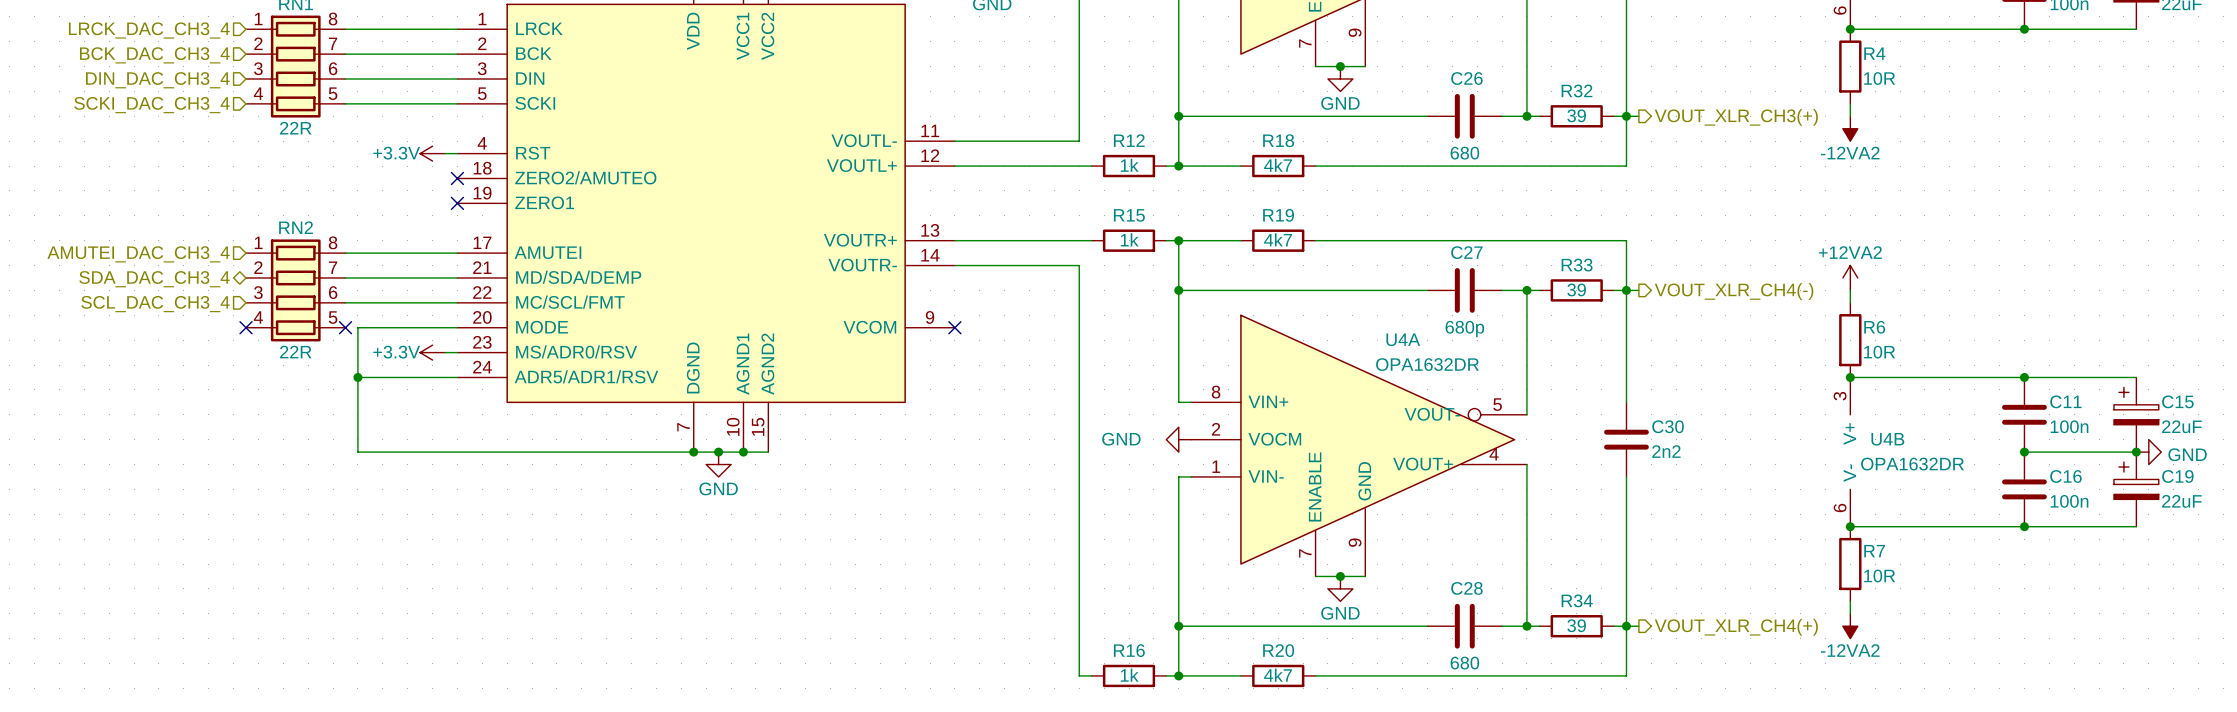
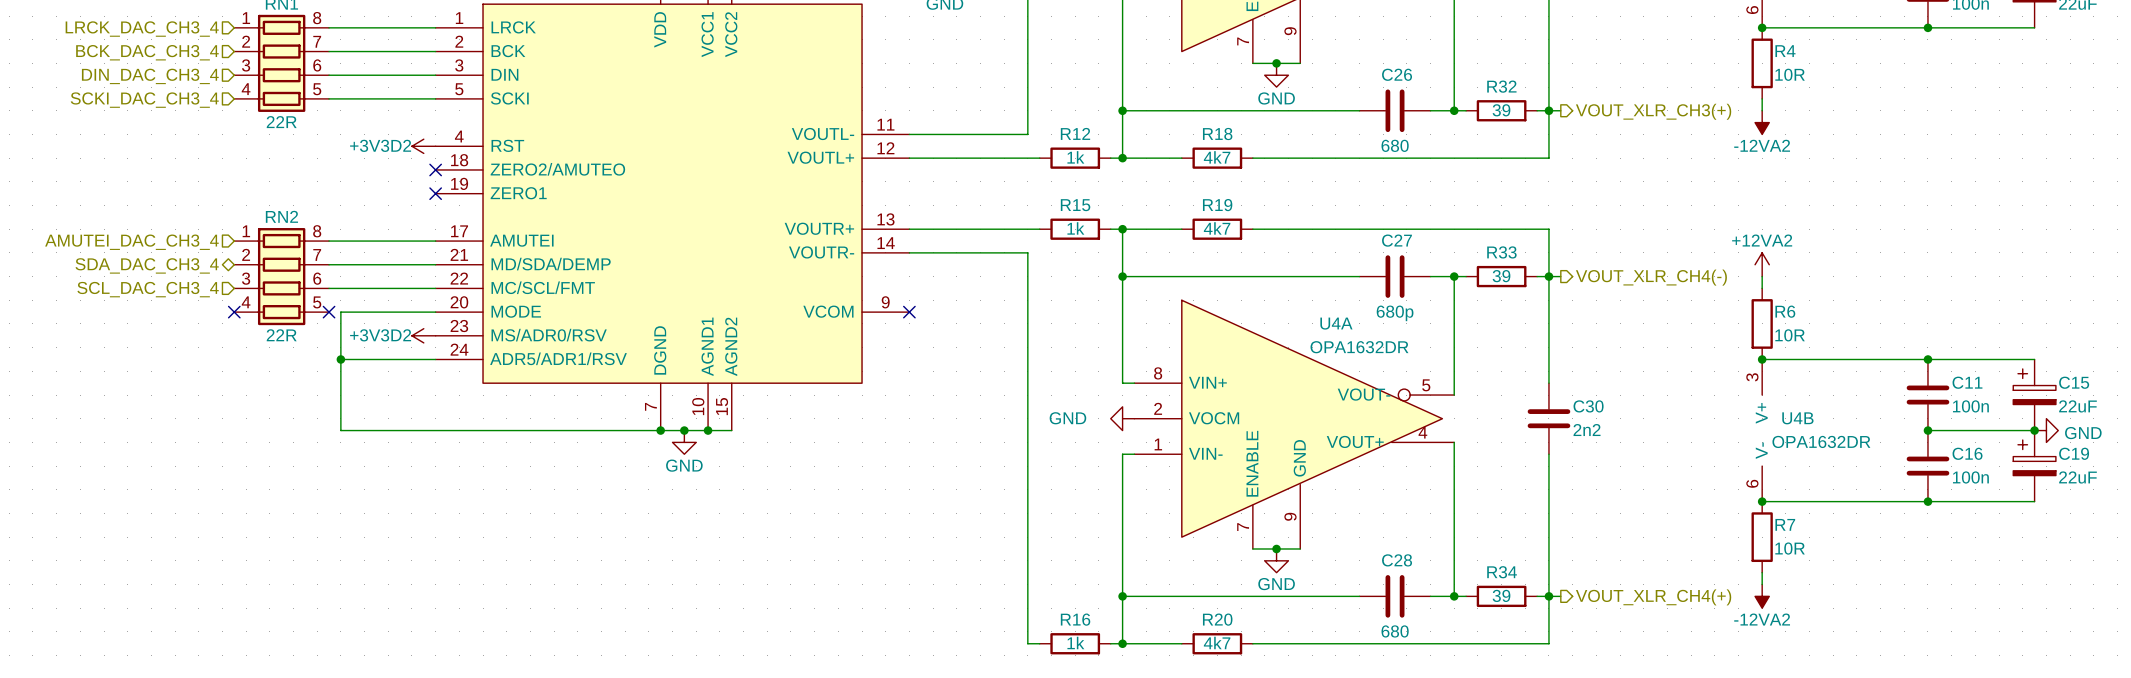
power symbol: +3.3V (432, 153) -> none
power symbol: none -> +3V3D2 (423, 146)
power symbol: +3.3V (432, 352) -> none
power symbol: none -> +3V3D2 (423, 335)

